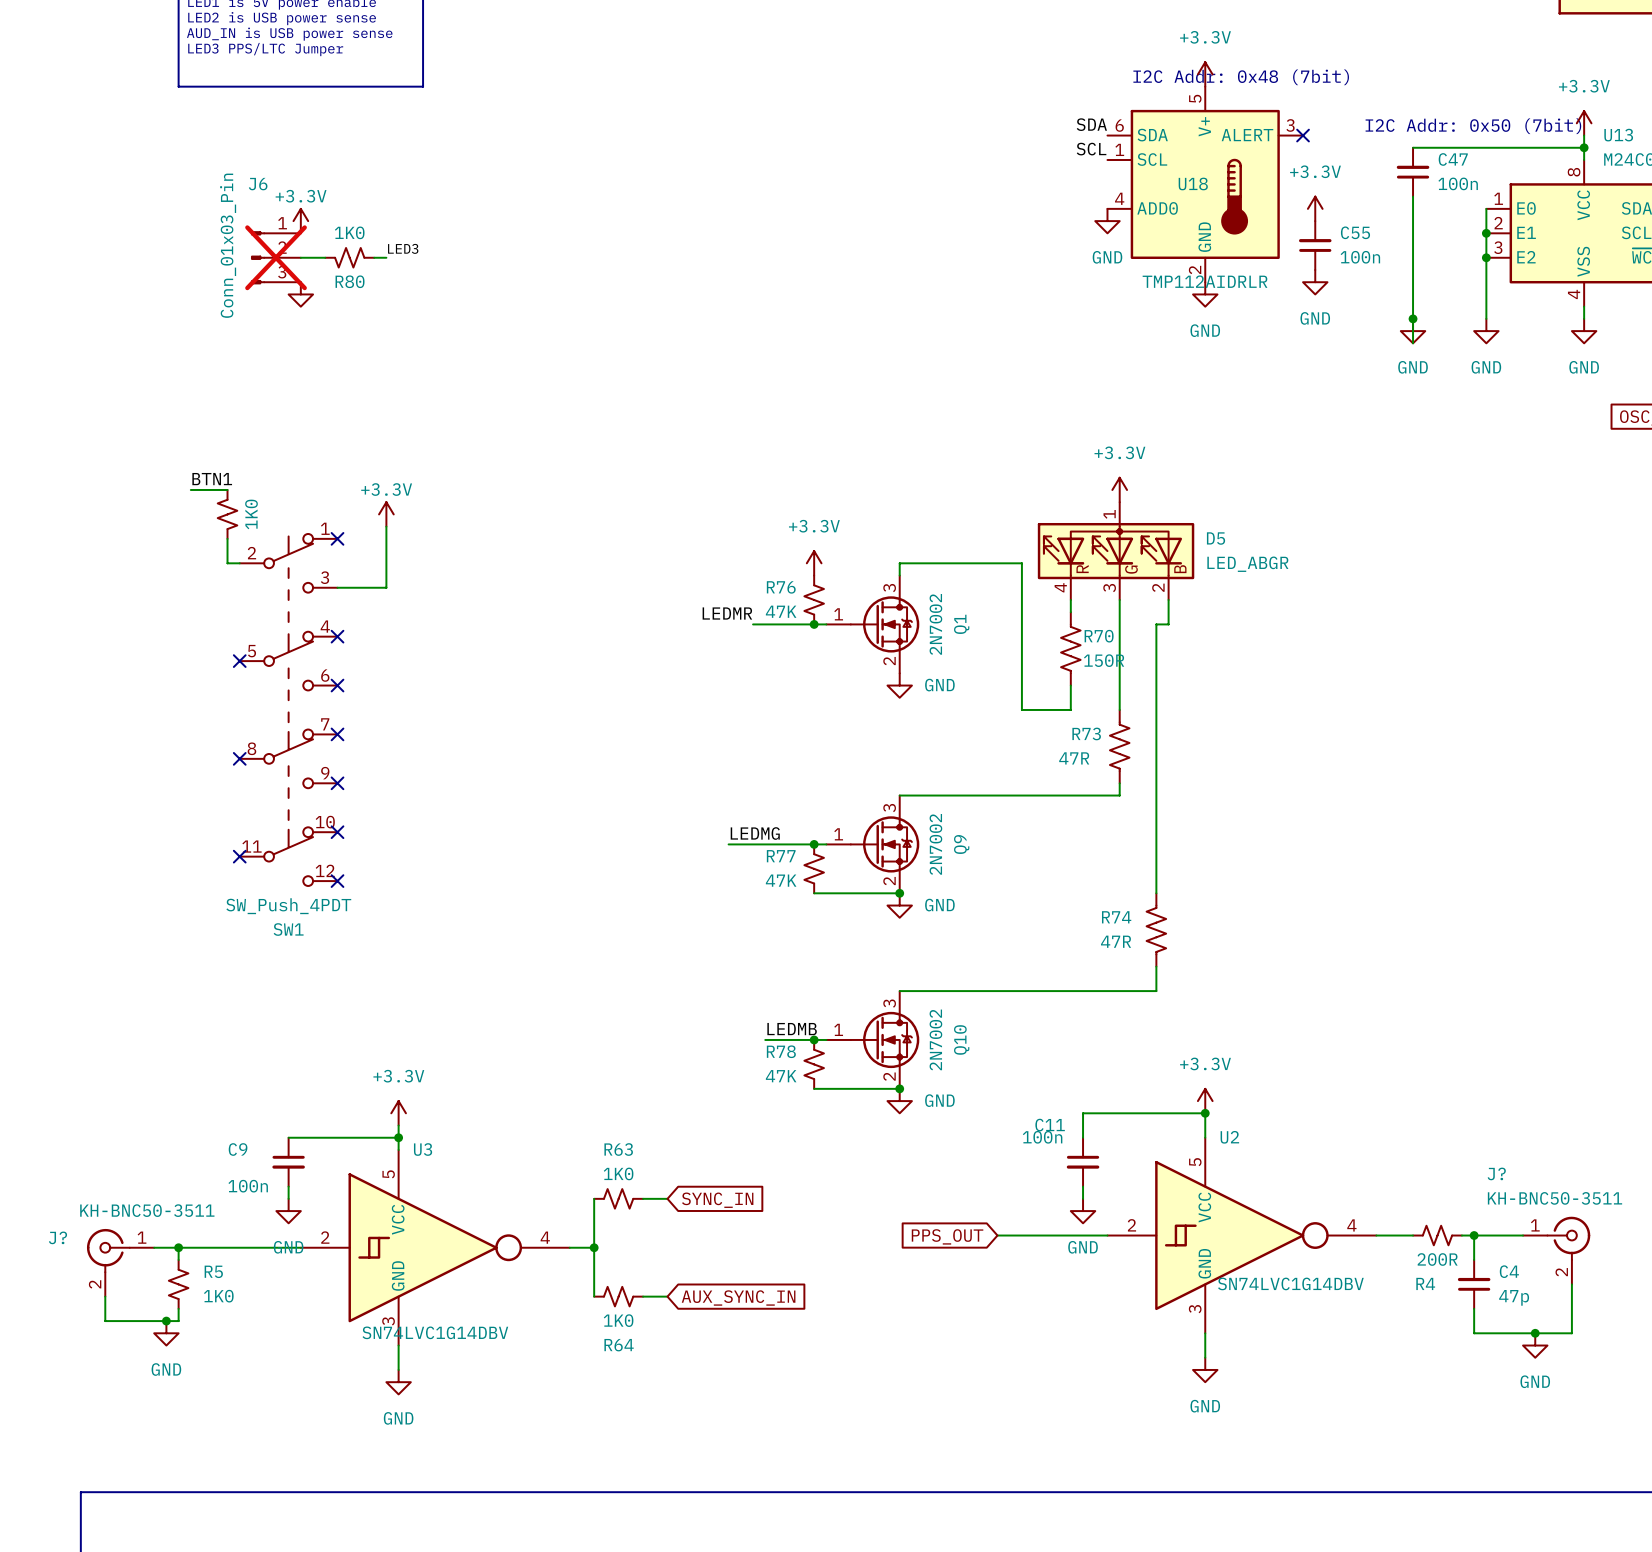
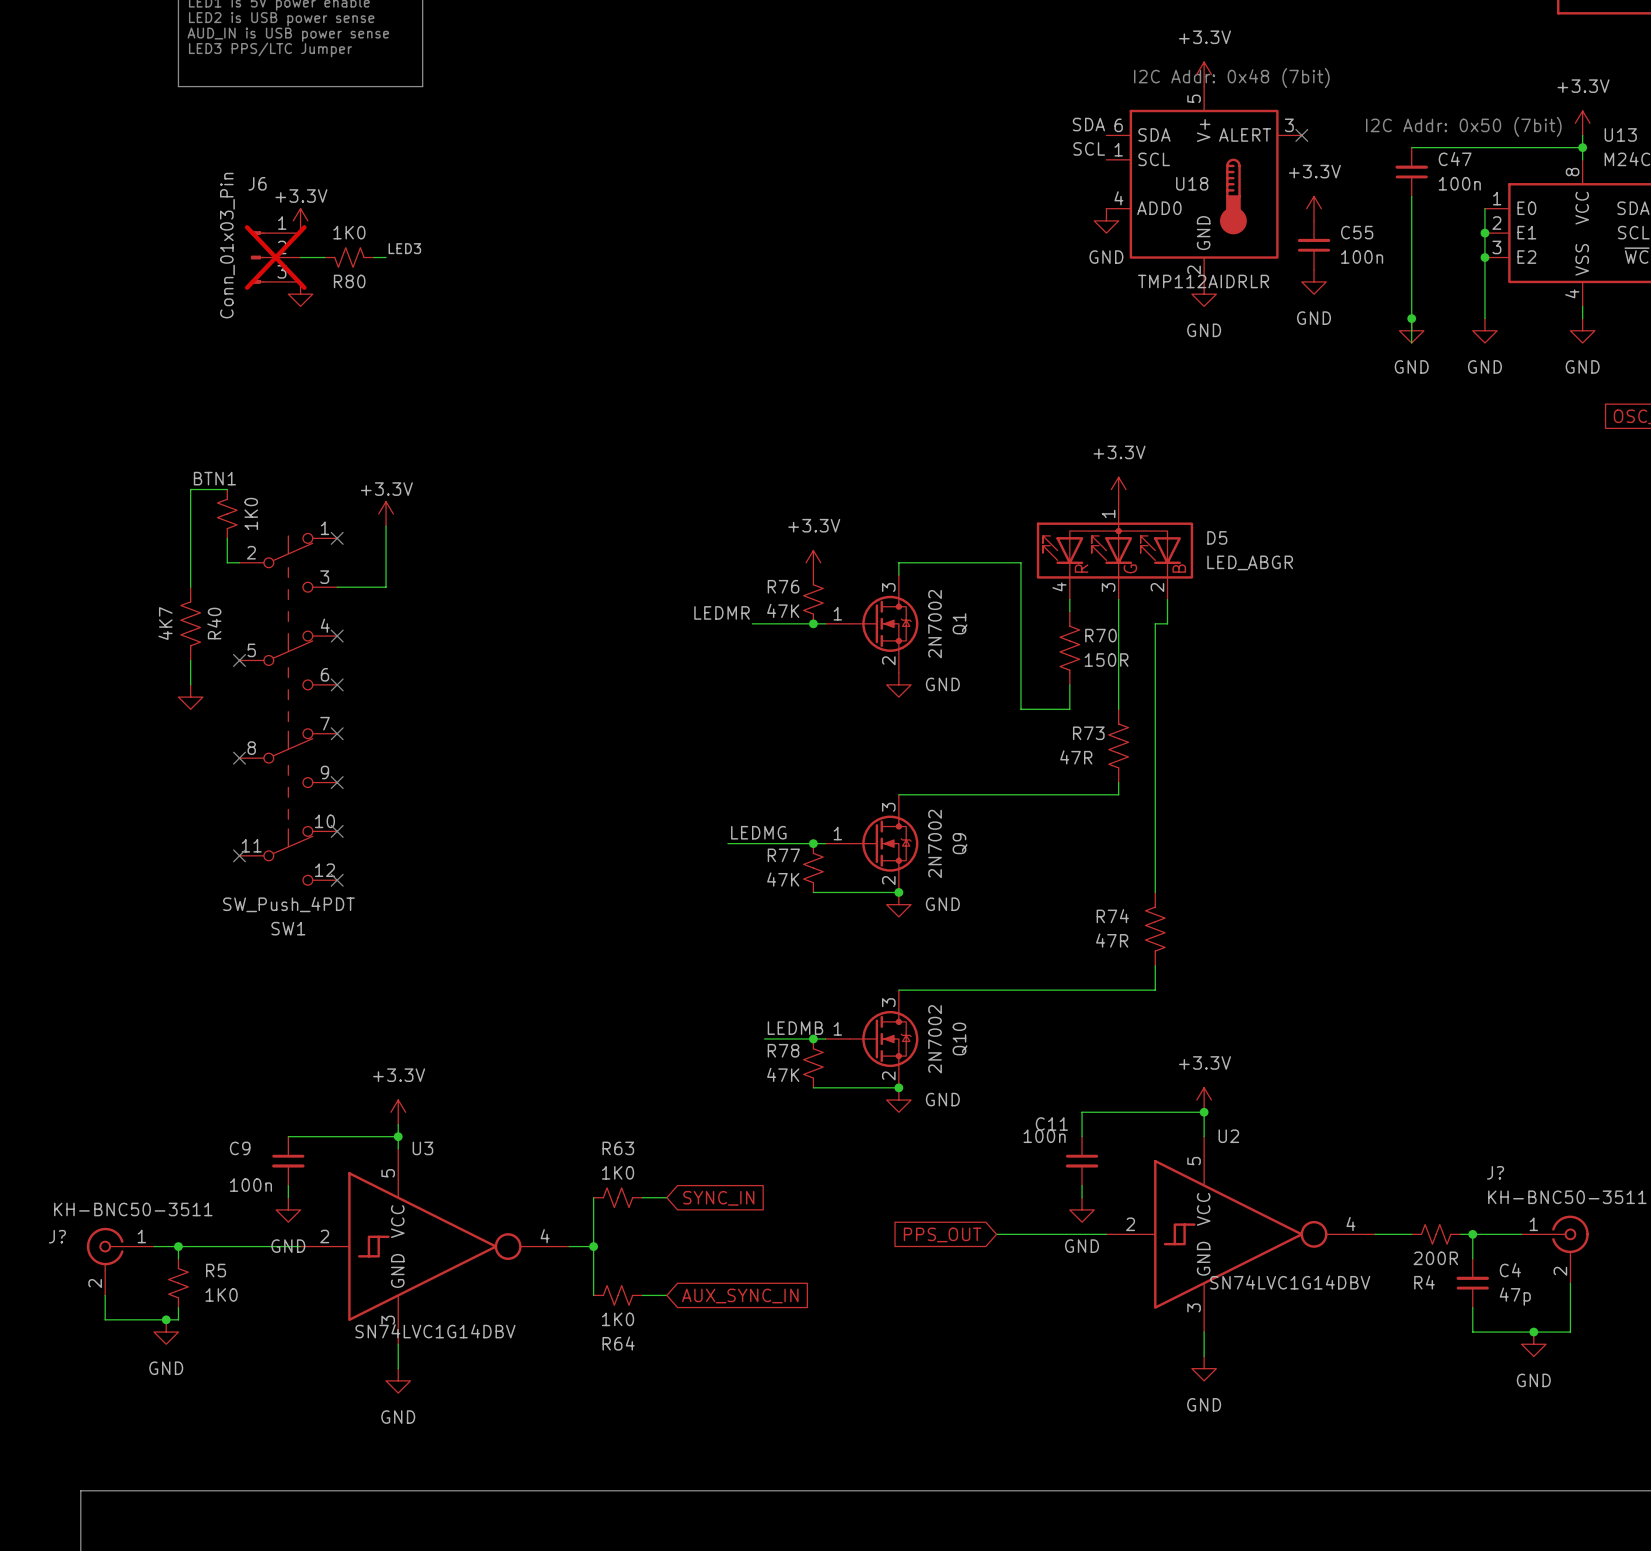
wire: none -> (190, 489) (190, 587)
R40: none -> 4K7 (190, 623)
wire: none -> (190, 660) (190, 684)
power symbol: none -> (190, 697)

